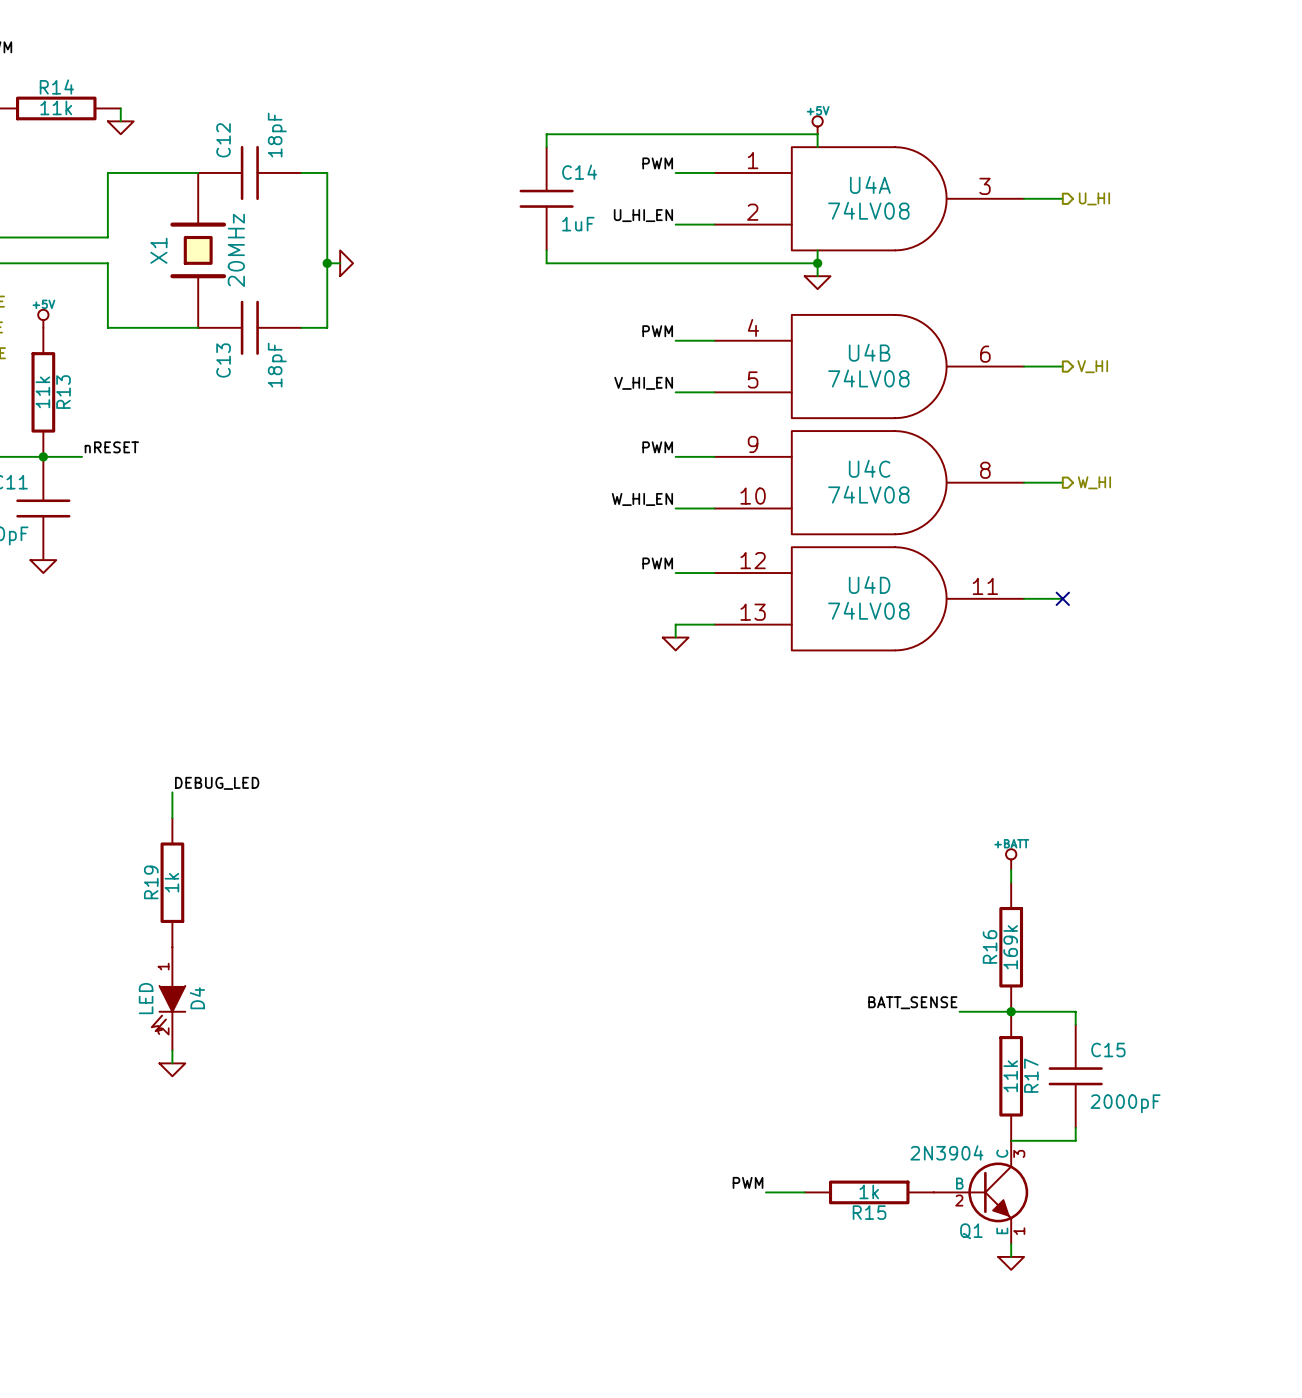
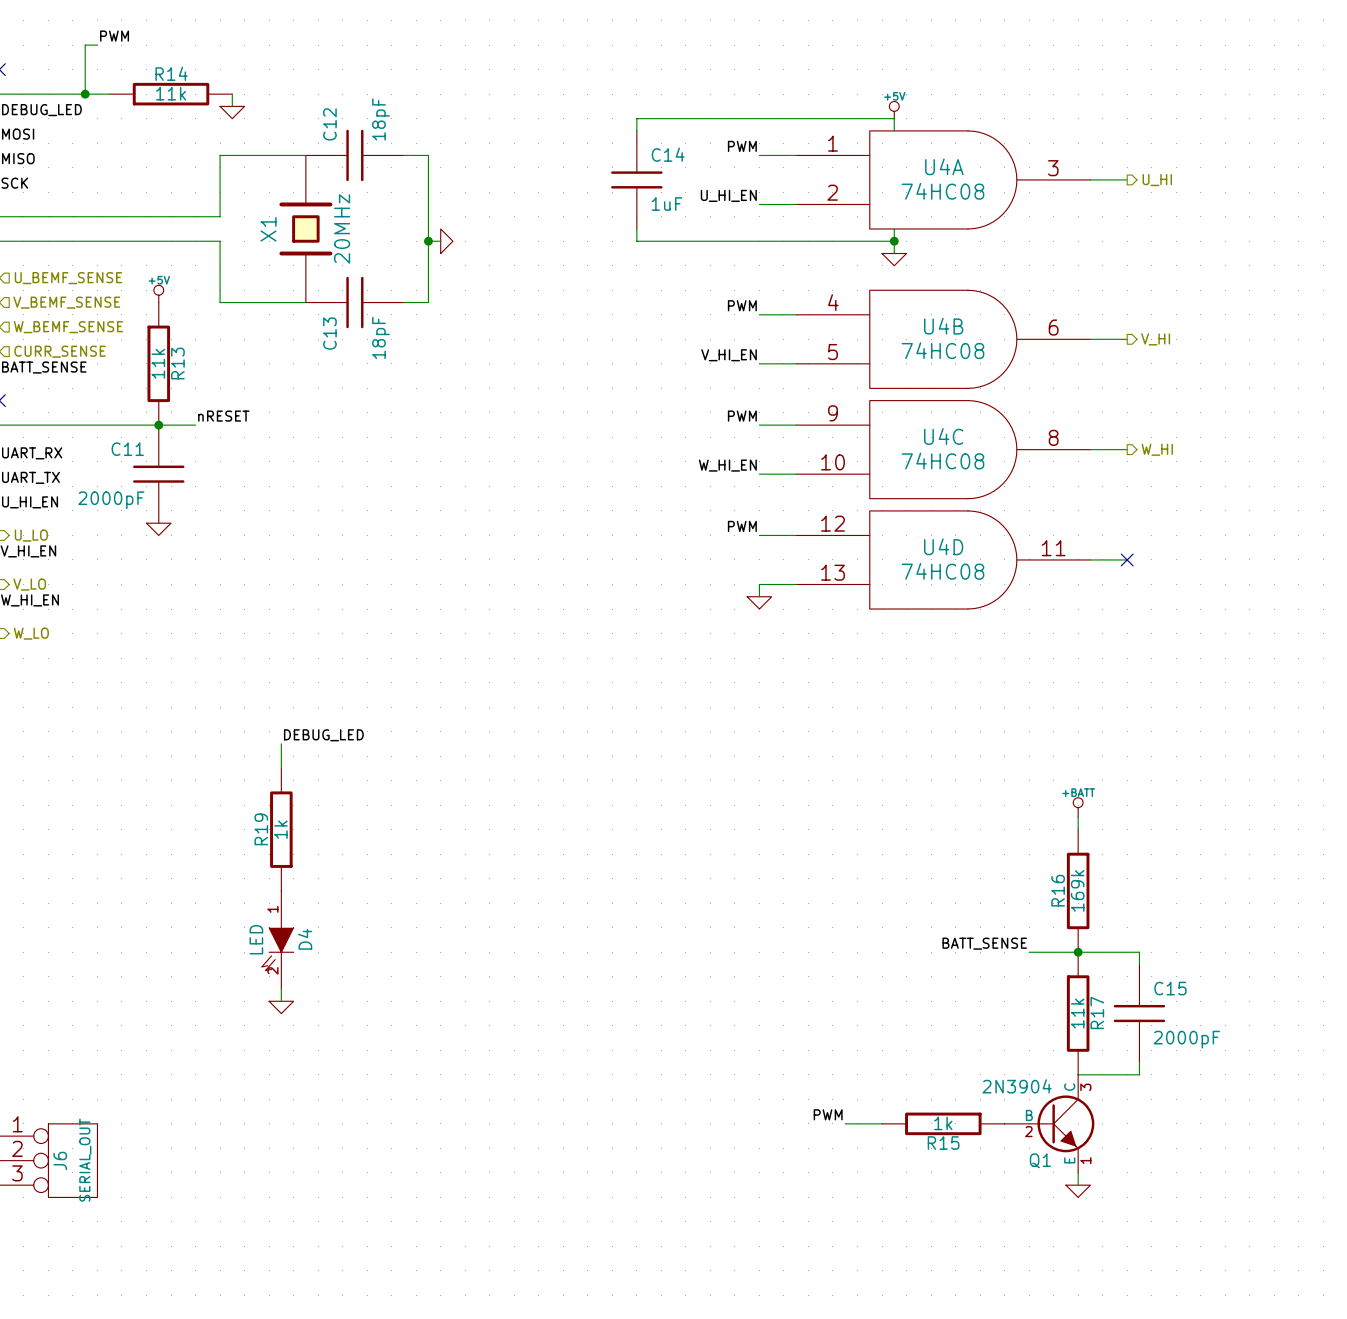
U4A value: 74LV08 (868, 210) -> 74HC08 (942, 191)
U4B value: 74LV08 (868, 378) -> 74HC08 (942, 350)
U4C value: 74LV08 (868, 494) -> 74HC08 (942, 461)
U4D value: 74LV08 (868, 610) -> 74HC08 (942, 571)

